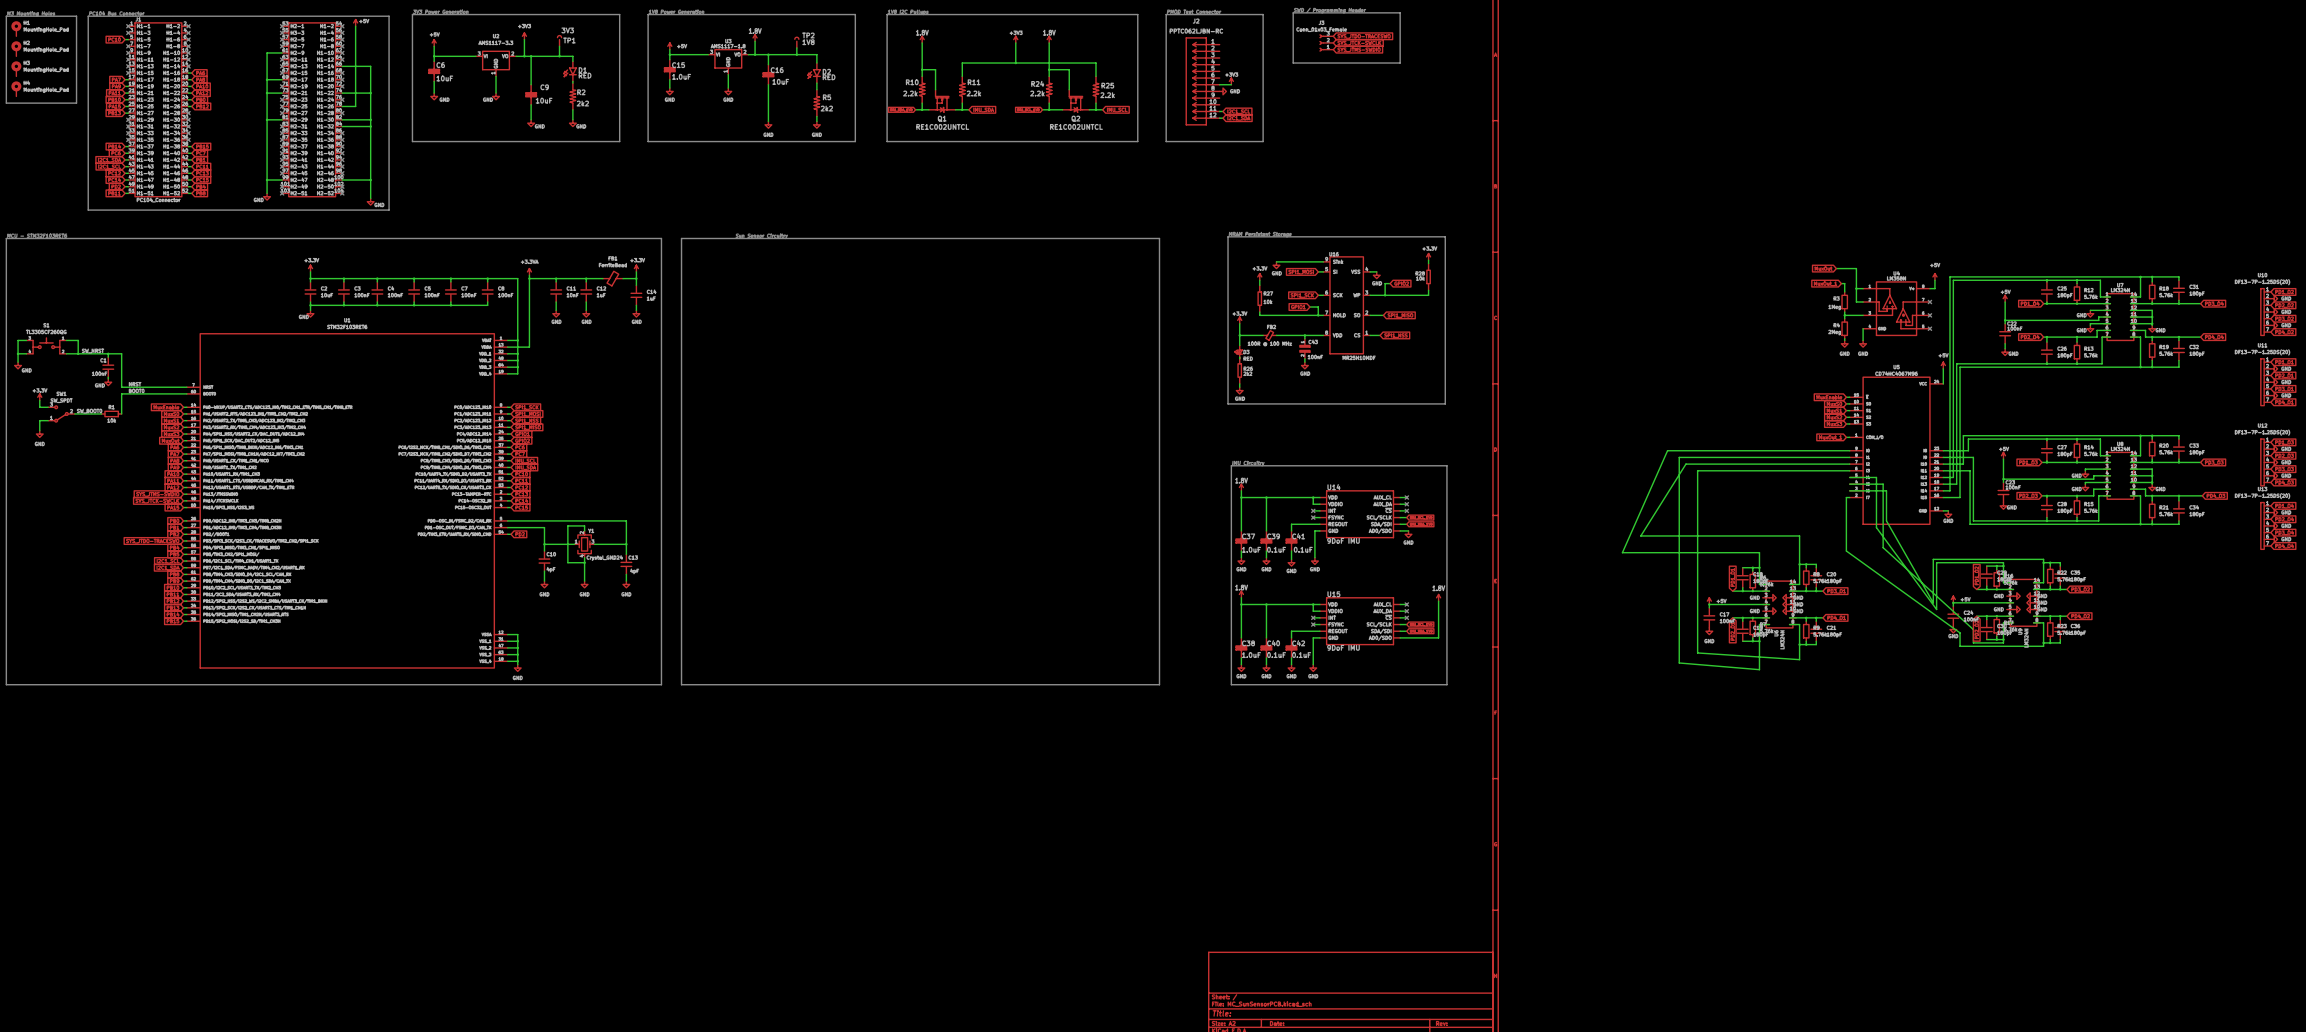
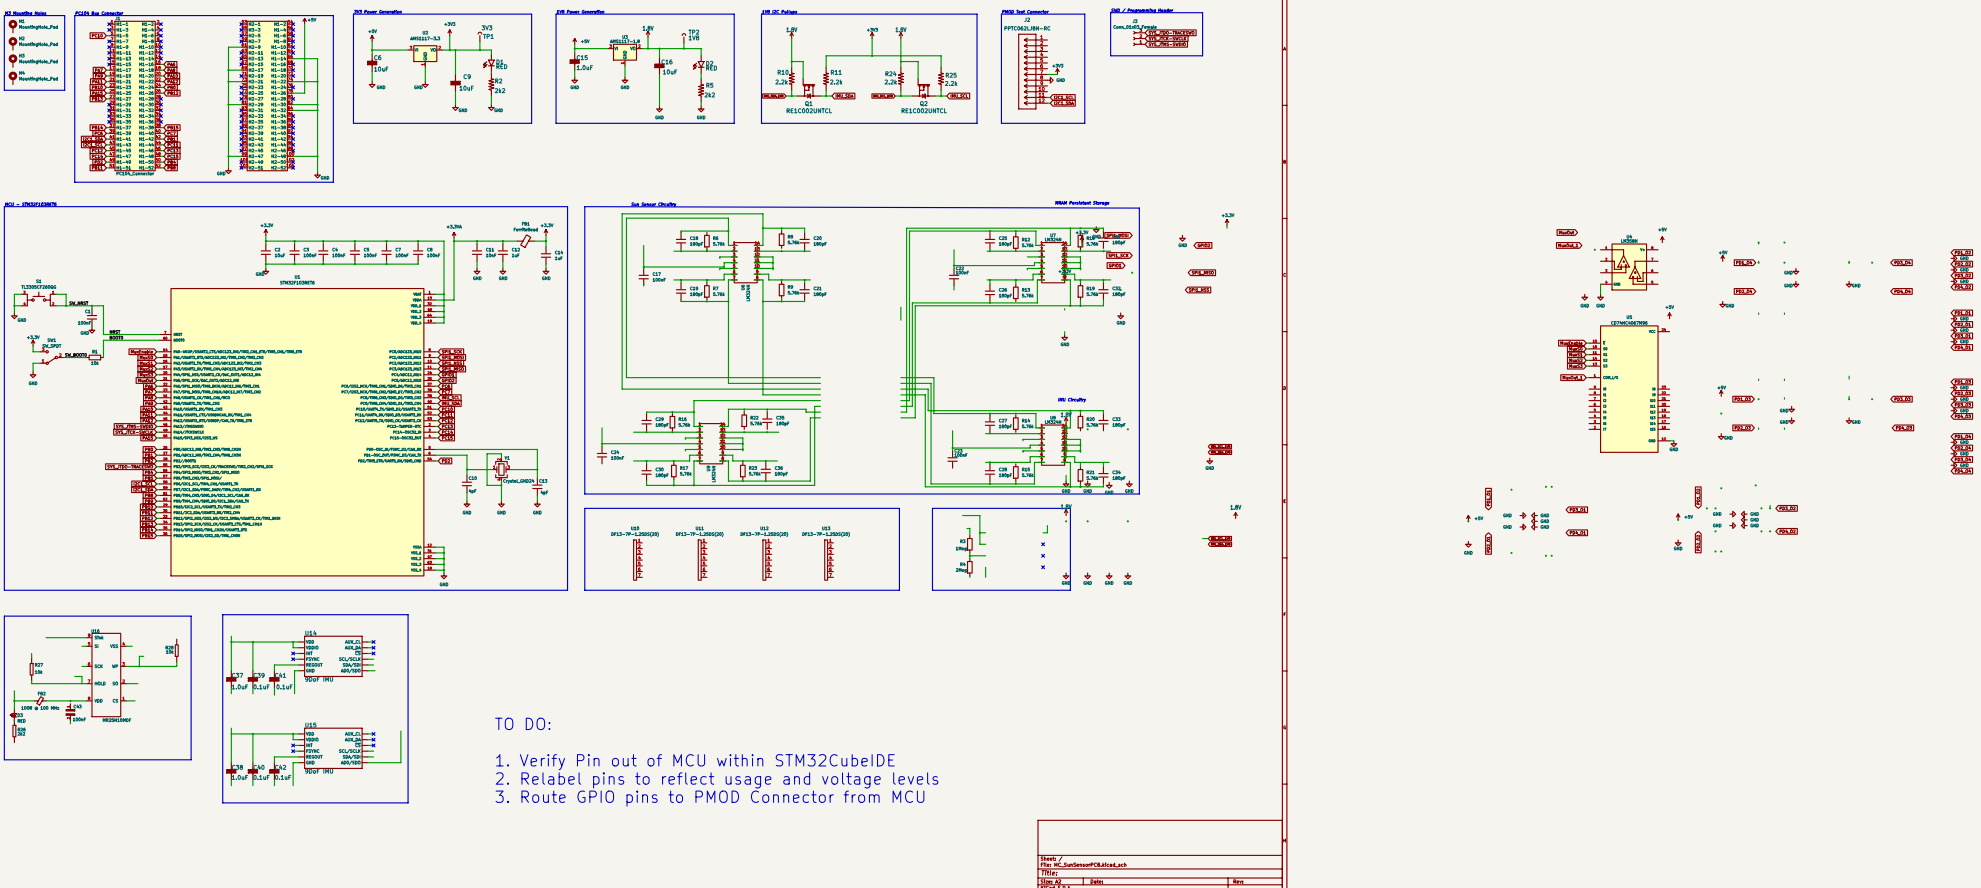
line: (1228, 236) (1228, 403) (1445, 403) (1445, 236) (1228, 236) -> none
line: (681, 238) (1159, 238) (1159, 684) -> none
wire: (1276, 261) (1323, 261) -> none
wire: none -> (762, 228) (804, 228) (804, 232)
wire: none -> (781, 228) (781, 231)
wire: none -> (1070, 228) (1070, 245) (1061, 245)
junction: none -> (1080, 228)
wire: none -> (728, 231) (681, 232)
junction: none -> (989, 231)
wire: none -> (1015, 231) (1015, 233)
wire: none -> (1103, 231) (1103, 228) (906, 228) (906, 412) (900, 412)
wire: (1836, 268) (1856, 268) (1856, 302) (1863, 302) -> none
wire: (1318, 271) (1323, 271) -> none
wire: (1370, 271) (1376, 271) -> none
part position: (1428, 276) -> (176, 650)
wire: (2140, 276) (2140, 296) (2130, 296) -> none
wire: (2152, 276) (2152, 281) -> none
wire: (1934, 280) (1934, 288) (1929, 288) -> none
wire: (2077, 280) (2077, 283) -> none
wire: (2178, 280) (2178, 276) (1950, 276) (1950, 490) (1943, 490) -> none
wire: none -> (643, 245) (643, 268)
wire: none -> (737, 245) (728, 245) (728, 218) (626, 218) (626, 377) (820, 377)
wire: none -> (754, 245) (762, 245) (762, 213) (622, 213) (622, 389) (820, 389)
wire: none -> (1044, 245) (1035, 245) (1035, 231) (909, 231) (909, 400) (900, 400)
wire: (1390, 283) (1385, 283) (1385, 295) -> none
wire: (1841, 283) (1844, 283) (1844, 291) -> none
wire: none -> (954, 249) (954, 268)
wire: (1856, 288) (1863, 288) -> none
wire: none -> (673, 251) (737, 251)
junction: none -> (681, 251)
wire: none -> (754, 251) (810, 251)
junction: none -> (781, 251)
junction: none -> (804, 251)
wire: none -> (987, 251) (1044, 251)
junction: none -> (989, 251)
wire: none -> (1061, 251) (1110, 251)
junction: none -> (1080, 251)
junction: none -> (1103, 251)
wire: (1428, 290) (1428, 295) (1370, 295) -> none
part position: (2178, 290) -> (1103, 239)
part position: (2046, 291) -> (989, 241)
part position: (2152, 291) -> (1080, 241)
part position: (2077, 293) -> (1015, 242)
wire: (1318, 295) (1323, 295) -> none
wire: none -> (737, 256) (719, 258)
wire: none -> (754, 256) (772, 256) (772, 269)
wire: none -> (1027, 256) (1044, 256)
wire: none -> (1061, 256) (1080, 256) (1080, 269)
wire: (2110, 296) (2100, 296) (2100, 280) (1953, 280) (1953, 477) (1943, 477) -> none
part position: (1259, 298) -> (31, 669)
wire: (2178, 300) (2178, 303) -> none
part position: (1844, 302) -> (969, 544)
no-connect mark: (1929, 302) -> none
wire: (2005, 302) (2005, 323) -> none
wire: none -> (737, 262) (724, 262) (724, 267) (643, 267)
wire: none -> (754, 262) (772, 262)
wire: none -> (1044, 262) (1034, 262) (1034, 265) (954, 265)
wire: none -> (1061, 262) (1080, 262)
wire: (2043, 303) (2110, 303) -> none
wire: (2130, 303) (2200, 303) -> none
part position: (1346, 305) -> (106, 675)
wire: (1309, 307) (1318, 307) (1318, 315) -> none
wire: none -> (737, 268) (719, 269)
wire: none -> (754, 268) (772, 268)
wire: none -> (1044, 268) (1027, 269)
wire: none -> (1061, 268) (1080, 268)
wire: (2090, 310) (2110, 310) -> none
wire: (2130, 310) (2152, 310) (2152, 325) -> none
wire: (1259, 312) (1259, 315) (1323, 315) -> none
wire: (1844, 312) (1844, 318) -> none
part position: (2265, 312) -> (637, 560)
wire: (1370, 315) (1383, 315) -> none
wire: (1844, 315) (1863, 315) -> none
no-connect mark: (1929, 315) -> none
wire: none -> (737, 274) (724, 274) (724, 279) (673, 279)
wire: none -> (754, 274) (768, 274) (768, 279) (810, 279)
wire: none -> (1044, 274) (1033, 274) (1033, 279) (987, 279)
wire: none -> (1061, 274) (1074, 274) (1074, 279) (1110, 279)
wire: (2110, 317) (2098, 317) (2098, 320) (2005, 320) -> none
part position: (2120, 317) -> (1053, 262)
wire: (2130, 317) (2152, 317) -> none
wire: none -> (681, 279) (681, 282)
wire: none -> (706, 279) (706, 282)
wire: none -> (737, 279) (728, 279) (728, 383) (820, 383)
wire: none -> (754, 279) (762, 279) (762, 394) (820, 394)
junction: none -> (781, 279)
wire: none -> (804, 279) (804, 282)
wire: none -> (989, 279) (989, 284)
wire: none -> (1015, 279) (1015, 284)
wire: none -> (1044, 279) (1037, 279) (1037, 302) (912, 302) (912, 406) (900, 406)
wire: none -> (1061, 279) (1070, 279) (1070, 305)
wire: (1239, 323) (1239, 345) -> none
wire: (2110, 323) (2090, 323) (2090, 325) -> none
wire: (2130, 323) (2152, 323) -> none
wire: none -> (643, 282) (643, 285)
part position: (1844, 328) -> (969, 567)
no-connect mark: (1929, 328) -> none
wire: none -> (954, 285) (954, 289)
wire: (2110, 330) (2097, 330) (2097, 337) (2043, 337) -> none
wire: (2130, 330) (2145, 330) (2145, 337) (2200, 337) -> none
part position: (2005, 333) -> (954, 277)
wire: (1239, 335) (1263, 335) -> none
part position: (1269, 335) -> (40, 700)
wire: (1276, 335) (1323, 335) -> none
wire: (1370, 335) (1380, 335) -> none
wire: (2046, 337) (2046, 342) -> none
wire: (2077, 337) (2077, 342) -> none
wire: (2110, 337) (2102, 337) (2102, 363) (1956, 363) (1956, 484) (1943, 484) -> none
wire: (2130, 337) (2140, 337) (2140, 367) -> none
wire: (2152, 337) (2152, 340) -> none
wire: (2178, 337) (2178, 340) -> none
wire: (1844, 338) (1844, 340) -> none
wire: (2005, 343) (2005, 348) -> none
wire: none -> (781, 298) (781, 301)
wire: none -> (681, 300) (728, 301)
wire: none -> (804, 300) (762, 301)
wire: none -> (1080, 300) (1080, 305)
wire: none -> (1103, 300) (1103, 305) (915, 305) (915, 417) (900, 417)
part position: (1304, 348) -> (70, 712)
junction: none -> (989, 302)
part position: (2152, 350) -> (1080, 291)
part position: (2178, 350) -> (1103, 291)
part position: (1238, 352) -> (13, 715)
part position: (2046, 352) -> (989, 292)
part position: (2077, 352) -> (1015, 292)
wire: none -> (900, 307) (900, 320)
wire: (1304, 358) (1304, 362) -> (1080, 279) (1080, 282)
wire: (2152, 360) (2152, 367) -> none
wire: (2178, 360) (2178, 367) (1960, 367) (1960, 497) (1943, 497) -> none
wire: (1943, 368) (1943, 383) -> none
part position: (1239, 370) -> (14, 731)
part position: (2265, 382) -> (702, 560)
wire: (2140, 435) (2140, 455) (2130, 455) -> none
wire: none -> (900, 377) (933, 377) (933, 413) (1035, 413) (1035, 427) (1044, 427)
wire: (2178, 439) (2178, 435) (1963, 435) (1963, 464) (1943, 464) -> none
wire: none -> (900, 383) (931, 383) (931, 483) (1034, 483) (1034, 462) (1044, 462)
part position: (2152, 449) -> (1080, 422)
part position: (2178, 449) -> (1103, 422)
wire: none -> (900, 389) (928, 389) (928, 410) (1103, 410) (1103, 413)
wire: (1849, 450) (1667, 450) (1622, 552) (1759, 552) (1759, 584) (1769, 584) -> none
wire: (1943, 450) (1968, 450) (1968, 439) (2100, 439) (2100, 455) (2110, 455) -> none
part position: (2046, 450) -> (989, 423)
part position: (2077, 450) -> (1015, 423)
wire: none -> (900, 394) (925, 394) (925, 486) (1103, 486) (1103, 483)
wire: (1849, 457) (1679, 457) (1679, 662) (1759, 669) (1759, 624) (1769, 624) -> none
wire: (1943, 457) (1973, 457) (1973, 520) (2098, 520) (2098, 495) (2110, 495) -> none
wire: (2003, 459) (2003, 482) -> none
wire: (2178, 459) (2178, 462) -> none
wire: (2041, 462) (2110, 462) -> none
wire: (2130, 462) (2200, 462) -> none
part position: (2265, 462) -> (767, 560)
wire: none -> (820, 400) (693, 400) (693, 426) (702, 426)
wire: (1849, 464) (1685, 464) (1640, 535) (1799, 535) (1799, 584) (1789, 584) -> none
wire: (2110, 469) (2085, 469) (2085, 470) -> none
wire: (2130, 469) (2152, 469) (2152, 484) -> none
wire: none -> (820, 406) (814, 406) (814, 485) (646, 485) (646, 481)
wire: (1849, 470) (1697, 470) (1697, 652) (1799, 659) (1799, 624) (1789, 624) -> none
wire: (1943, 470) (1970, 470) (1970, 524) (2178, 524) (2178, 520) -> none
wire: none -> (744, 409) (744, 412)
wire: none -> (767, 409) (767, 412)
wire: none -> (1070, 410) (1070, 427) (1061, 427)
wire: none -> (1080, 410) (1080, 413)
wire: (2110, 475) (2093, 475) (2093, 479) (2003, 479) -> none
part position: (2120, 475) -> (1053, 445)
wire: (2130, 475) (2152, 475) -> none
junction: none -> (672, 412)
wire: none -> (693, 412) (646, 413)
wire: none -> (820, 412) (806, 412) (806, 409) (728, 409) (728, 426) (719, 426)
wire: (1849, 477) (1876, 477) (1876, 527) (1936, 609) (1936, 562) (2003, 562) (2003, 582) (2013, 582) -> none
wire: none -> (989, 413) (989, 414)
wire: (2110, 482) (2085, 482) (2085, 484) -> none
wire: (2130, 482) (2152, 482) -> none
wire: none -> (820, 417) (810, 417) (810, 481) (728, 481) (728, 460) (719, 460)
wire: (1849, 484) (1883, 484) (1883, 547) (1973, 629) (1973, 642) (2003, 642) (2003, 622) (2013, 622) -> none
wire: (2110, 489) (2093, 489) (2093, 495) (2041, 495) -> none
wire: (2130, 489) (2145, 489) (2145, 495) (2202, 495) -> none
wire: (1849, 490) (1886, 490) (1886, 520) (1933, 602) (1933, 559) (2043, 559) (2043, 582) (2033, 582) -> none
part position: (2003, 492) -> (952, 459)
wire: none -> (602, 427) (602, 446)
wire: (2130, 495) (2140, 495) (2140, 524) -> none
wire: (2152, 495) (2152, 500) -> none
wire: (2178, 495) (2178, 500) -> none
wire: (1241, 497) (1319, 497) -> none
wire: (1266, 497) (1266, 530) -> none
wire: (1313, 497) (1313, 504) (1319, 504) -> none
wire: (1400, 497) (1406, 497) -> none
no-connect mark: (1406, 497) -> none
wire: (1849, 497) (1846, 497) (1846, 551) (1960, 632) (1960, 646) (2043, 646) (2043, 622) (2033, 622) -> none
wire: none -> (952, 430) (952, 450)
wire: none -> (633, 432) (702, 432)
junction: none -> (646, 432)
junction: none -> (672, 432)
wire: none -> (719, 432) (778, 432)
junction: none -> (744, 432)
junction: none -> (767, 432)
wire: none -> (989, 432) (989, 433)
wire: none -> (985, 433) (1044, 433)
wire: (1400, 504) (1406, 504) -> none
no-connect mark: (1406, 504) -> none
wire: none -> (702, 437) (685, 439)
wire: none -> (719, 437) (742, 437) (742, 450)
part position: (2046, 507) -> (989, 472)
part position: (2077, 507) -> (1015, 472)
wire: none -> (1044, 439) (1022, 440)
wire: none -> (1061, 439) (1080, 439) (1080, 452)
wire: (1313, 510) (1319, 510) -> none
no-connect mark: (1313, 510) -> none
wire: (1400, 510) (1406, 510) -> none
no-connect mark: (1406, 510) -> none
part position: (2152, 510) -> (1080, 475)
part position: (2178, 510) -> (1103, 475)
wire: none -> (602, 443) (702, 443)
wire: none -> (719, 443) (742, 443)
part position: (1360, 514) -> (333, 656)
wire: none -> (1044, 445) (1030, 445) (1030, 448) (952, 448)
wire: none -> (1061, 445) (1080, 445)
wire: (1313, 517) (1319, 517) -> none
no-connect mark: (1313, 517) -> none
wire: (1400, 517) (1406, 517) -> none
wire: (2046, 517) (2046, 520) -> none
wire: (2077, 517) (2077, 520) -> none
wire: none -> (702, 449) (685, 450)
wire: none -> (719, 449) (742, 449)
wire: (2152, 520) (2152, 524) -> none
wire: none -> (1044, 450) (1022, 452)
wire: none -> (1061, 450) (1080, 450)
wire: (1319, 524) (1291, 524) (1291, 530) -> none
wire: (1400, 524) (1406, 524) -> none
part position: (2265, 525) -> (829, 560)
wire: none -> (702, 455) (689, 455) (689, 460) (633, 460)
wire: none -> (719, 455) (732, 455) (732, 460) (777, 460)
wire: none -> (1044, 456) (1030, 456) (1030, 462) (985, 462)
wire: none -> (1061, 456) (1074, 456) (1074, 462) (1109, 462)
wire: (1319, 530) (1314, 530) (1314, 557) -> none
wire: (1400, 530) (1408, 530) -> none
wire: none -> (646, 460) (646, 463)
junction: none -> (673, 460)
wire: none -> (702, 460) (693, 460) (693, 485)
junction: none -> (742, 460)
junction: none -> (765, 460)
wire: none -> (989, 462) (989, 463)
wire: none -> (1061, 462) (1070, 462) (1070, 486)
wire: none -> (1080, 462) (1080, 466)
wire: none -> (1103, 462) (1103, 466)
part position: (1241, 540) -> (231, 679)
part position: (1266, 540) -> (252, 679)
part position: (1291, 540) -> (274, 679)
wire: (1266, 551) (1266, 557) -> none
wire: (1291, 551) (1291, 559) -> none
wire: none -> (673, 479) (673, 485)
junction: none -> (742, 481)
junction: none -> (765, 481)
wire: none -> (989, 481) (989, 483)
wire: none -> (1015, 481) (1015, 483)
wire: none -> (1080, 483) (1080, 486)
wire: (2043, 562) (2060, 562) (2060, 566) -> none
wire: (2050, 562) (2050, 566) -> none
wire: (1799, 564) (1816, 564) (1816, 567) -> none
wire: (1806, 564) (1806, 567) -> none
wire: (1986, 566) (2003, 566) -> none
wire: (1996, 566) (1996, 569) -> none
wire: (1742, 567) (1759, 567) -> none
wire: (1752, 567) (1752, 571) -> none
line: (681, 572) (681, 589) -> (584, 494) (1139, 494) (1139, 208) (584, 206)
part position: (1986, 576) -> (646, 422)
part position: (2050, 576) -> (744, 420)
part position: (2060, 576) -> (767, 420)
part position: (1742, 577) -> (681, 241)
part position: (1806, 577) -> (781, 239)
part position: (1816, 577) -> (804, 241)
part position: (1996, 579) -> (672, 422)
part position: (1752, 581) -> (706, 241)
wire: (1986, 586) (1986, 589) -> none
wire: (2050, 586) (2050, 589) -> none
wire: (1742, 587) (1742, 591) -> none
wire: (1806, 587) (1806, 591) -> none
wire: (1816, 587) (1816, 591) -> none
line: none -> (584, 508) (899, 508) (899, 590)
wire: (1976, 589) (2013, 589) -> none
wire: (2033, 589) (2066, 589) -> none
wire: (1732, 591) (1769, 591) -> none
wire: (1789, 591) (1822, 591) -> none
wire: none -> (962, 515) (979, 515) (979, 544) (985, 544)
wire: (1241, 597) (1241, 637) -> none
wire: (1438, 601) (1438, 637) (1400, 637) -> none
wire: (2013, 602) (1953, 602) (1953, 606) -> none
part position: (2023, 602) -> (711, 443)
wire: (1241, 604) (1319, 604) -> none
wire: (1266, 604) (1266, 637) -> none
wire: (1313, 604) (1313, 611) (1319, 611) -> none
wire: (1400, 604) (1406, 604) -> none
no-connect mark: (1406, 604) -> none
wire: (1769, 604) (1709, 604) (1709, 607) -> none
part position: (1779, 604) -> (745, 262)
wire: none -> (1047, 525) (1047, 532) (1043, 532)
wire: (1400, 611) (1406, 611) -> none
no-connect mark: (1406, 611) -> none
wire: none -> (966, 528) (969, 528) (969, 535)
part position: (1953, 616) -> (602, 455)
wire: (1976, 616) (2013, 616) -> none
wire: (1986, 616) (1986, 619) -> none
wire: (2033, 616) (2066, 616) -> none
wire: (2050, 616) (2050, 619) -> none
wire: (2060, 616) (2060, 619) -> none
wire: none -> (979, 532) (985, 532)
wire: (1313, 617) (1319, 617) -> none
no-connect mark: (1313, 617) -> none
wire: (1400, 617) (1406, 617) -> none
no-connect mark: (1406, 617) -> none
part position: (1709, 617) -> (643, 277)
wire: (1732, 617) (1769, 617) -> none
wire: (1742, 617) (1742, 621) -> none
wire: (1789, 617) (1822, 617) -> none
wire: (1806, 617) (1806, 621) -> none
wire: (1816, 617) (1816, 621) -> none
part position: (1360, 621) -> (333, 748)
wire: (1313, 624) (1319, 624) -> none
no-connect mark: (1313, 624) -> none
part position: (1996, 626) -> (673, 471)
part position: (1752, 627) -> (706, 291)
part position: (1986, 629) -> (646, 472)
part position: (2050, 629) -> (742, 471)
part position: (2060, 629) -> (765, 471)
no-connect mark: none -> (1043, 544)
wire: (1319, 631) (1291, 631) (1291, 637) -> none
wire: (1400, 631) (1406, 631) -> none
part position: (1742, 631) -> (681, 291)
part position: (1806, 631) -> (781, 289)
part position: (1816, 631) -> (804, 291)
wire: (1996, 636) (1996, 639) -> none
wire: (1319, 637) (1313, 637) (1313, 664) -> none
wire: (1752, 637) (1752, 641) -> none
wire: (1986, 639) (2003, 639) -> none
wire: (2050, 639) (2050, 642) -> none
wire: (2060, 639) (2060, 642) (2043, 642) -> none
wire: none -> (969, 552) (969, 558)
wire: (1742, 641) (1759, 641) -> none
wire: (1806, 641) (1806, 644) -> none
wire: (1816, 641) (1816, 644) (1799, 644) -> none
wire: none -> (969, 555) (985, 555)
no-connect mark: none -> (1043, 555)
part position: (1241, 647) -> (231, 771)
part position: (1266, 647) -> (252, 771)
part position: (1291, 647) -> (274, 771)
wire: none -> (985, 567) (985, 577)
no-connect mark: none -> (1043, 567)
wire: (1241, 657) (1241, 664) -> none
wire: (1266, 657) (1266, 664) -> none
wire: (1291, 657) (1291, 664) -> none
wire: none -> (969, 575) (969, 577)
line: (1047, 684) (1085, 684) -> (1070, 590) (1070, 508) (932, 508) (932, 590)
line: (1231, 684) (1231, 465) (1446, 465) (1446, 684) (1246, 684) -> (1057, 590) (995, 590)
line: none -> (222, 614) (222, 802) (408, 802) (408, 614) (222, 614)
line: none -> (4, 616) (4, 759) (191, 759) (191, 616) (4, 616)
wire: none -> (231, 636) (231, 670)
wire: none -> (46, 637) (86, 637)
wire: none -> (231, 641) (298, 641)
wire: none -> (252, 641) (252, 670)
wire: none -> (293, 641) (293, 647) (298, 647)
wire: none -> (367, 641) (373, 641)
no-connect mark: none -> (373, 641)
wire: none -> (81, 646) (86, 646)
wire: none -> (126, 646) (132, 646)
wire: none -> (367, 647) (373, 647)
no-connect mark: none -> (373, 647)
wire: none -> (31, 653) (31, 657)
wire: none -> (293, 653) (298, 653)
no-connect mark: none -> (293, 653)
wire: none -> (367, 653) (373, 653)
no-connect mark: none -> (373, 653)
wire: none -> (143, 656) (139, 656) (139, 666)
wire: none -> (293, 659) (298, 659)
no-connect mark: none -> (293, 659)
wire: none -> (367, 659) (373, 659)
wire: none -> (176, 662) (176, 666) (126, 666)
wire: none -> (298, 664) (274, 664) (274, 670)
wire: none -> (367, 664) (373, 664)
wire: none -> (81, 666) (86, 666)
wire: none -> (298, 670) (294, 670) (294, 693)
wire: none -> (367, 670) (375, 670)
wire: none -> (74, 676) (81, 676) (81, 683)
wire: none -> (31, 680) (31, 683) (86, 683)
wire: none -> (126, 683) (137, 683)
wire: none -> (231, 687) (231, 693)
wire: none -> (252, 687) (252, 693)
wire: none -> (274, 687) (274, 695)
wire: none -> (14, 690) (14, 709)
wire: none -> (14, 700) (34, 700)
wire: none -> (46, 700) (86, 700)
junction: none -> (70, 700)
wire: none -> (126, 700) (135, 700)
wire: none -> (14, 719) (14, 721)
wire: none -> (70, 721) (70, 723)
text: none -> TO DO: (522, 723)
wire: none -> (231, 728) (231, 762)
wire: none -> (400, 731) (400, 762) (367, 762)
wire: none -> (231, 733) (298, 733)
wire: none -> (252, 733) (252, 762)
wire: none -> (293, 733) (293, 739) (298, 739)
wire: none -> (367, 733) (373, 733)
no-connect mark: none -> (373, 733)
wire: none -> (367, 739) (373, 739)
no-connect mark: none -> (373, 739)
wire: none -> (293, 745) (298, 745)
no-connect mark: none -> (293, 745)
wire: none -> (367, 745) (373, 745)
no-connect mark: none -> (373, 745)
wire: none -> (293, 751) (298, 751)
no-connect mark: none -> (293, 751)
wire: none -> (367, 751) (373, 751)
wire: none -> (298, 756) (274, 756) (274, 762)
wire: none -> (367, 756) (373, 756)
text: none -> 1. Verify Pin out of MCU within STM32CubeIDE (695, 762)
wire: none -> (298, 762) (293, 762) (293, 785)
wire: none -> (231, 779) (231, 785)
wire: none -> (252, 779) (252, 785)
wire: none -> (274, 779) (274, 785)
text: none -> 2. Relabel pins to reflect usage and voltage levels (716, 780)
text: none -> 3. Route GPIO pins to PMOD Connector from MCU (709, 798)

